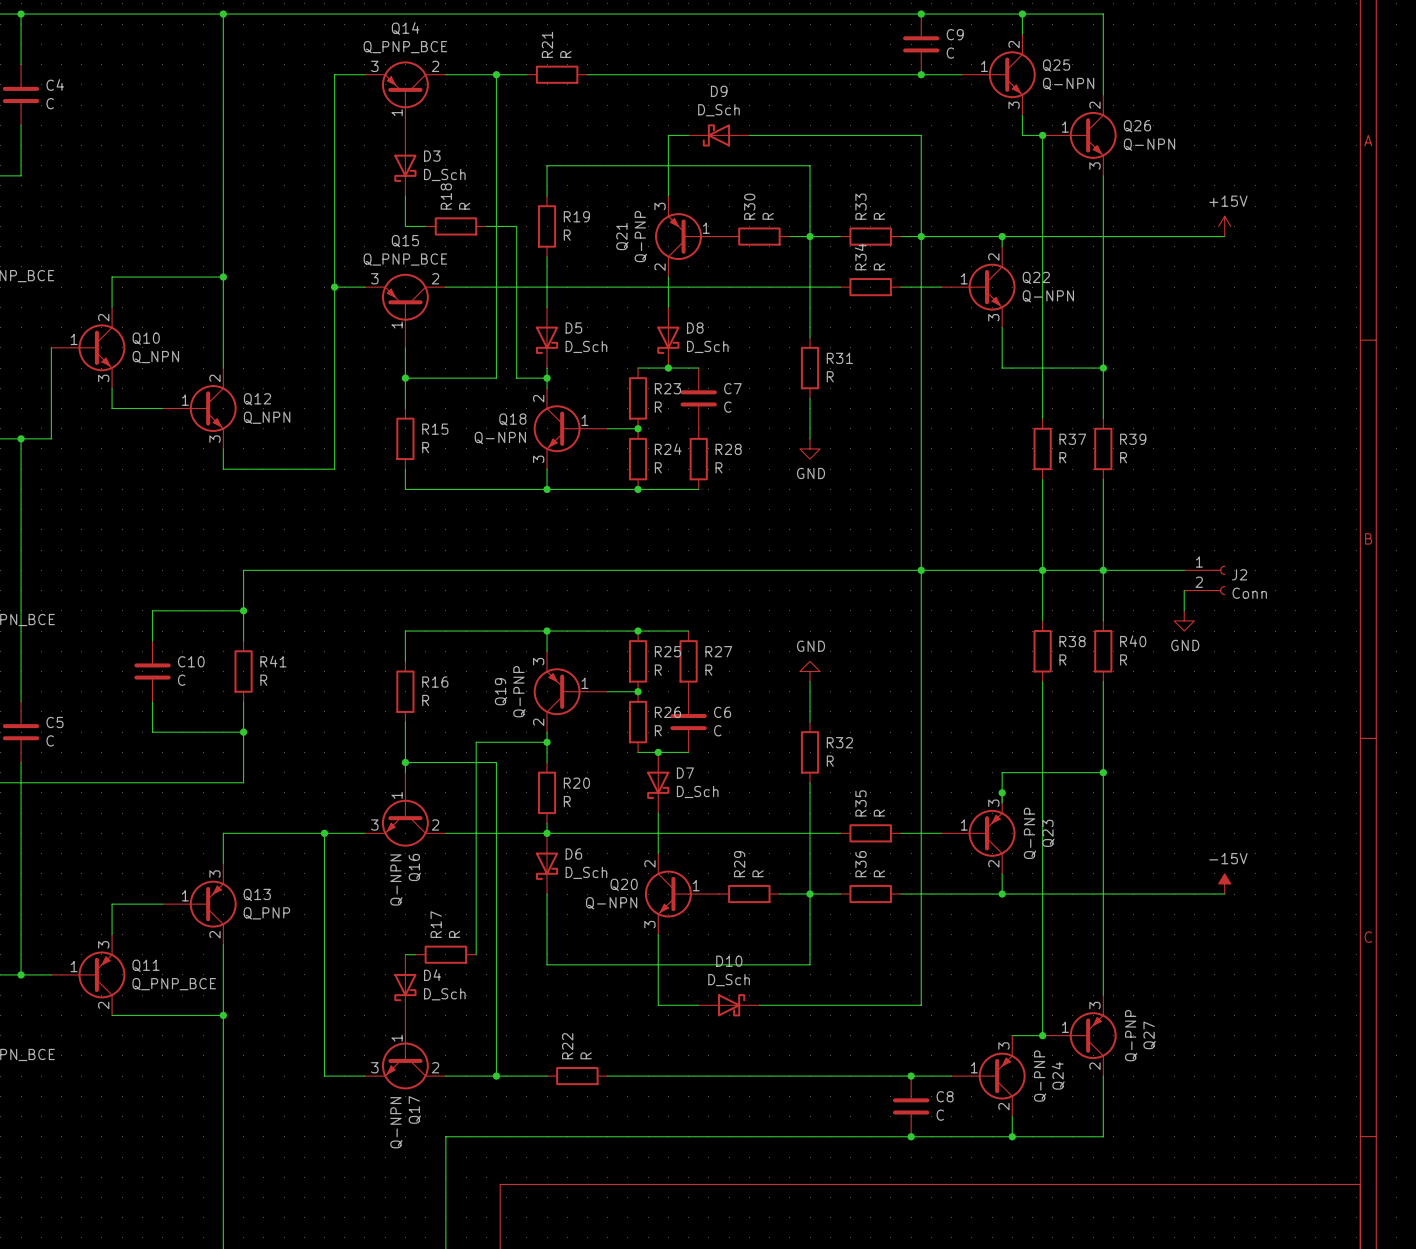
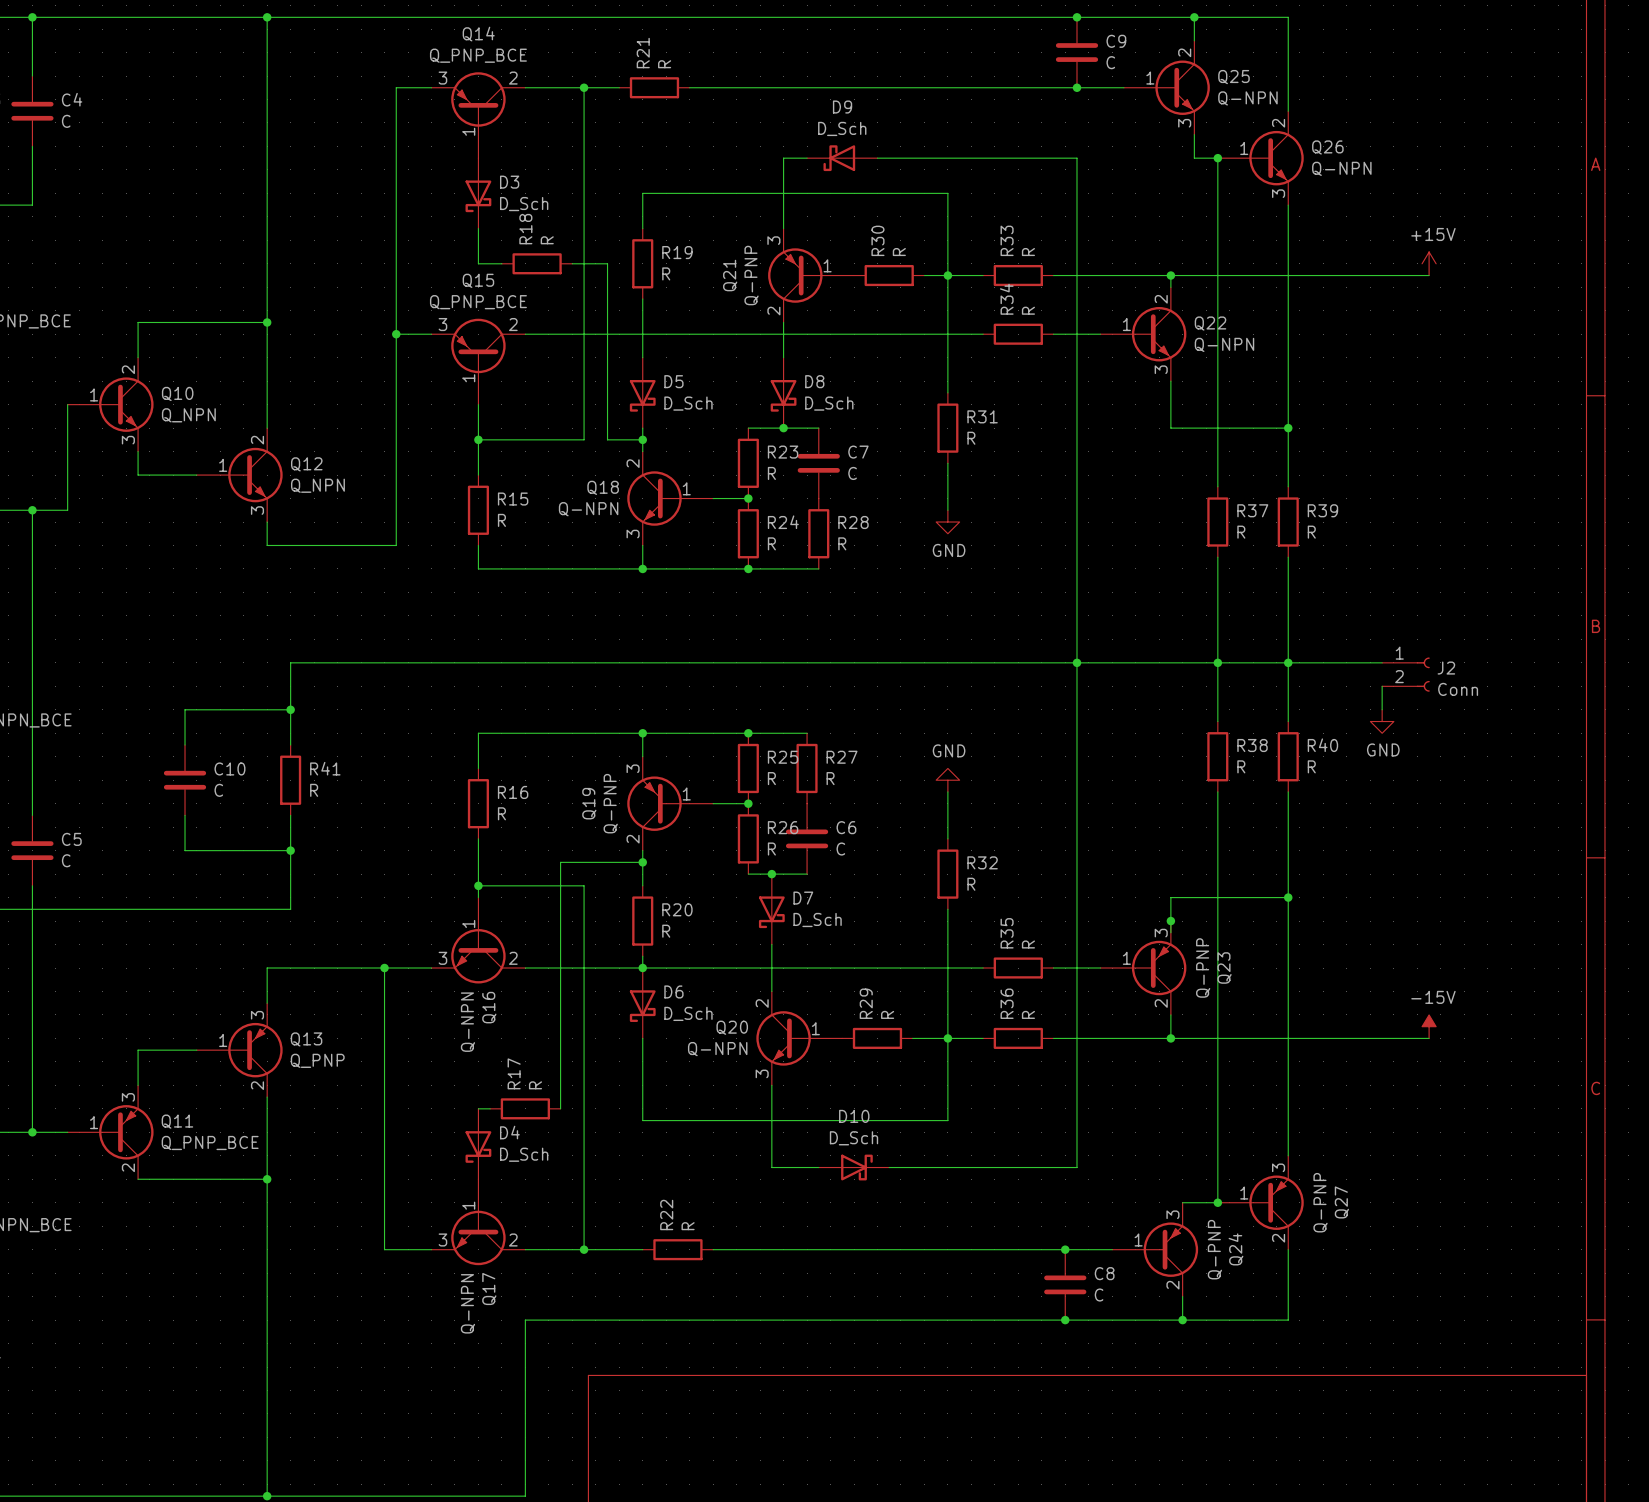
junction: (921, 236) -> none

